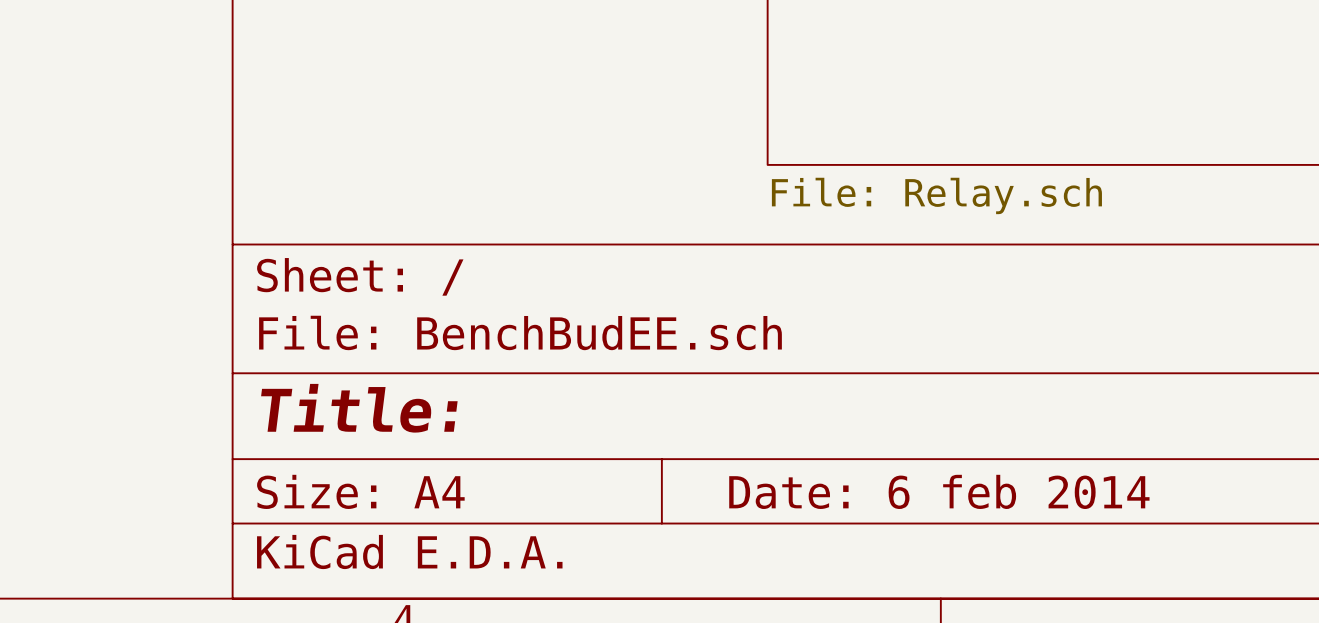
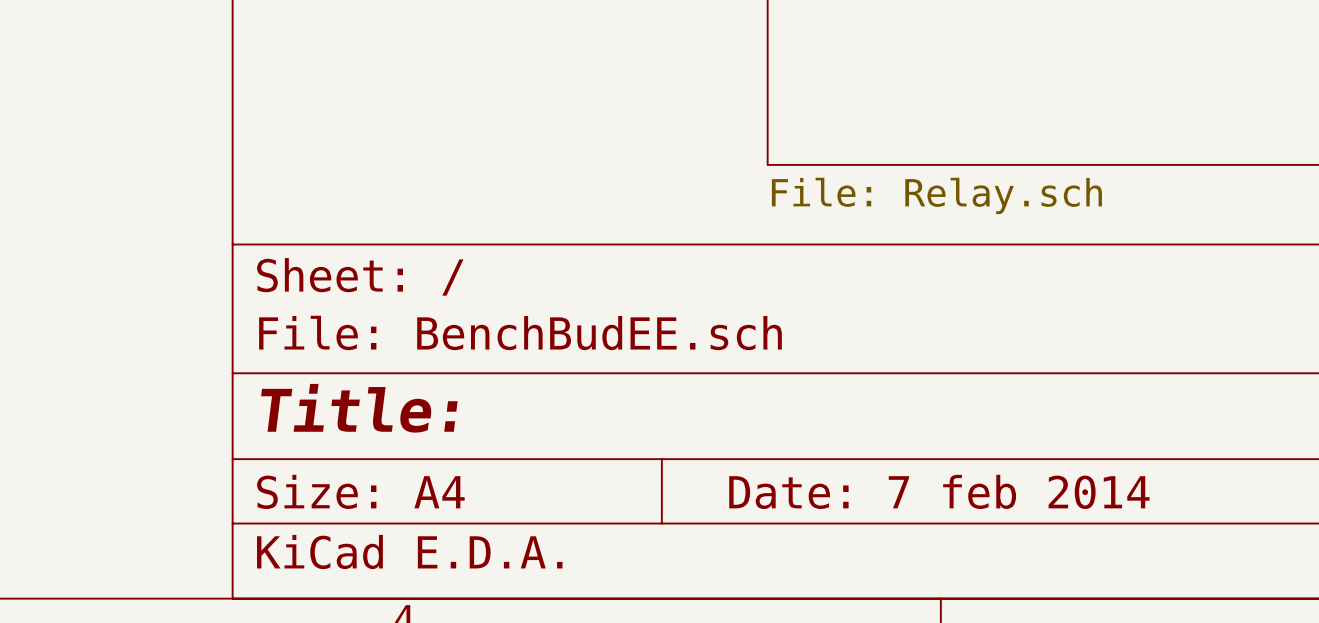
title block: Date: 6 feb 2014 (939, 491) -> Date: 7 feb 2014 (939, 491)

